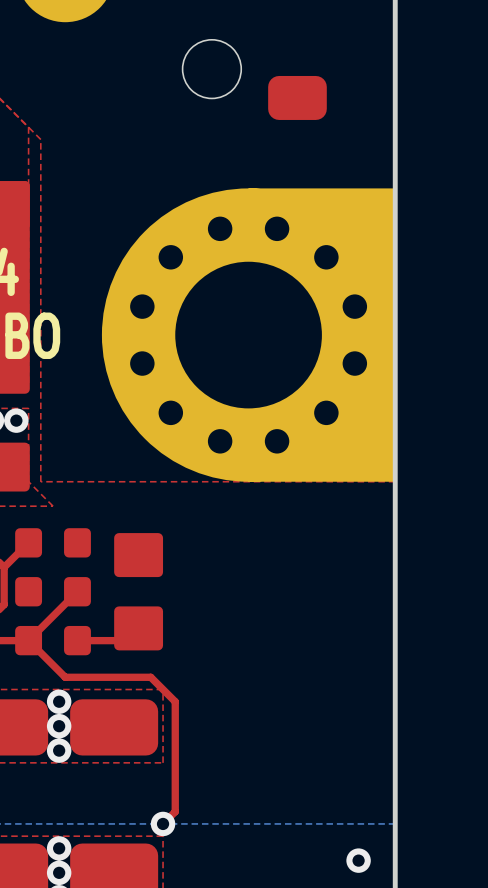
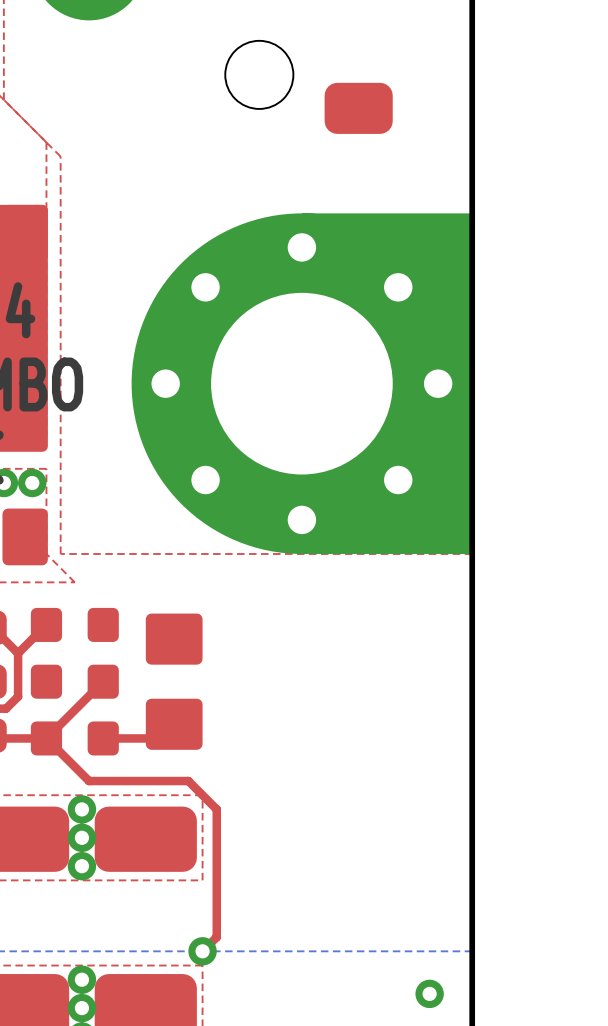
part footprint: [101, 188, 396, 482] -> [131, 213, 473, 554]

